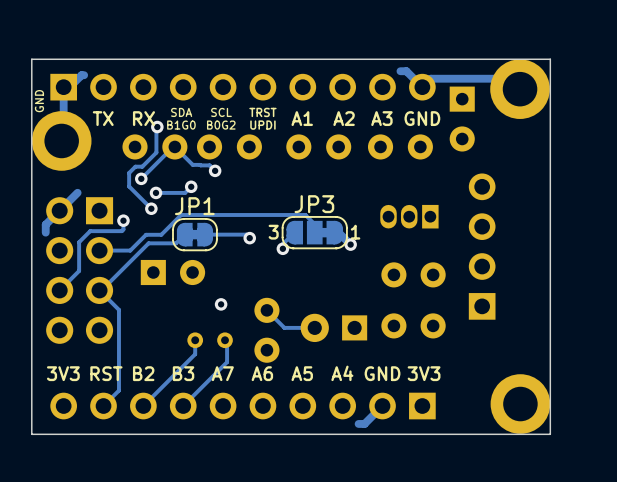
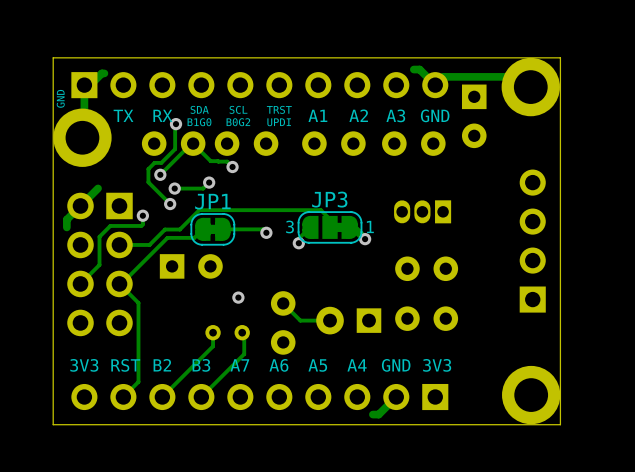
part position: (482, 246) -> (532, 241)

